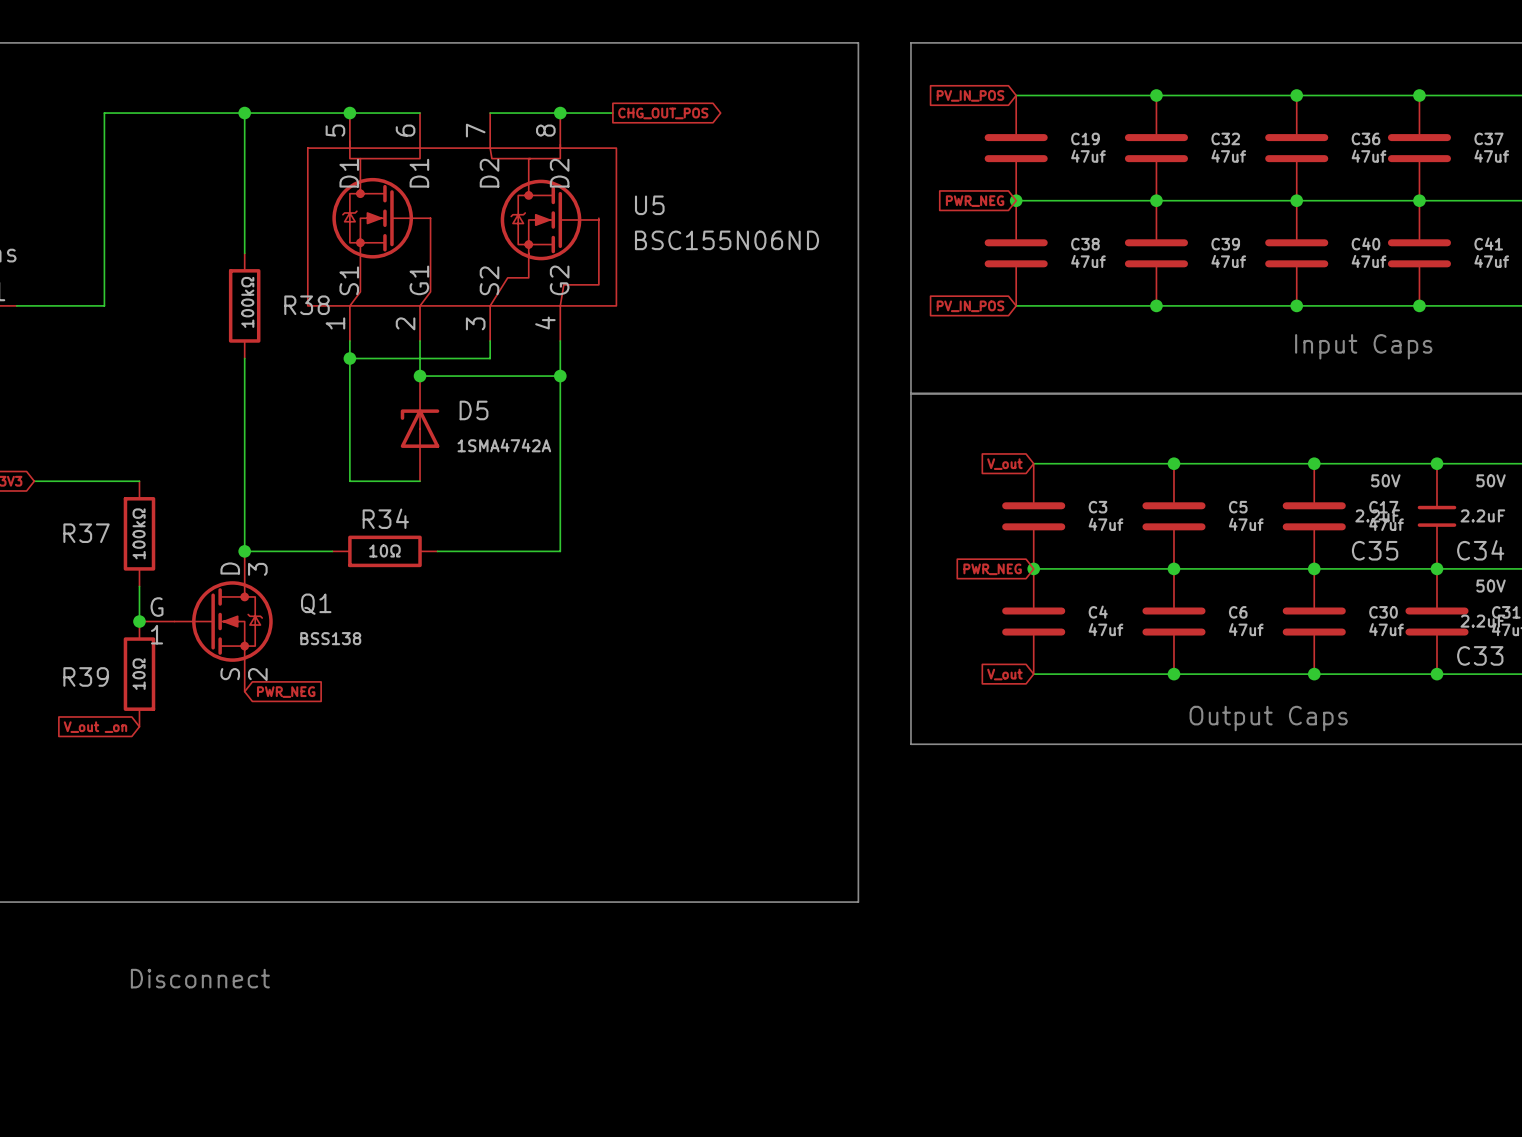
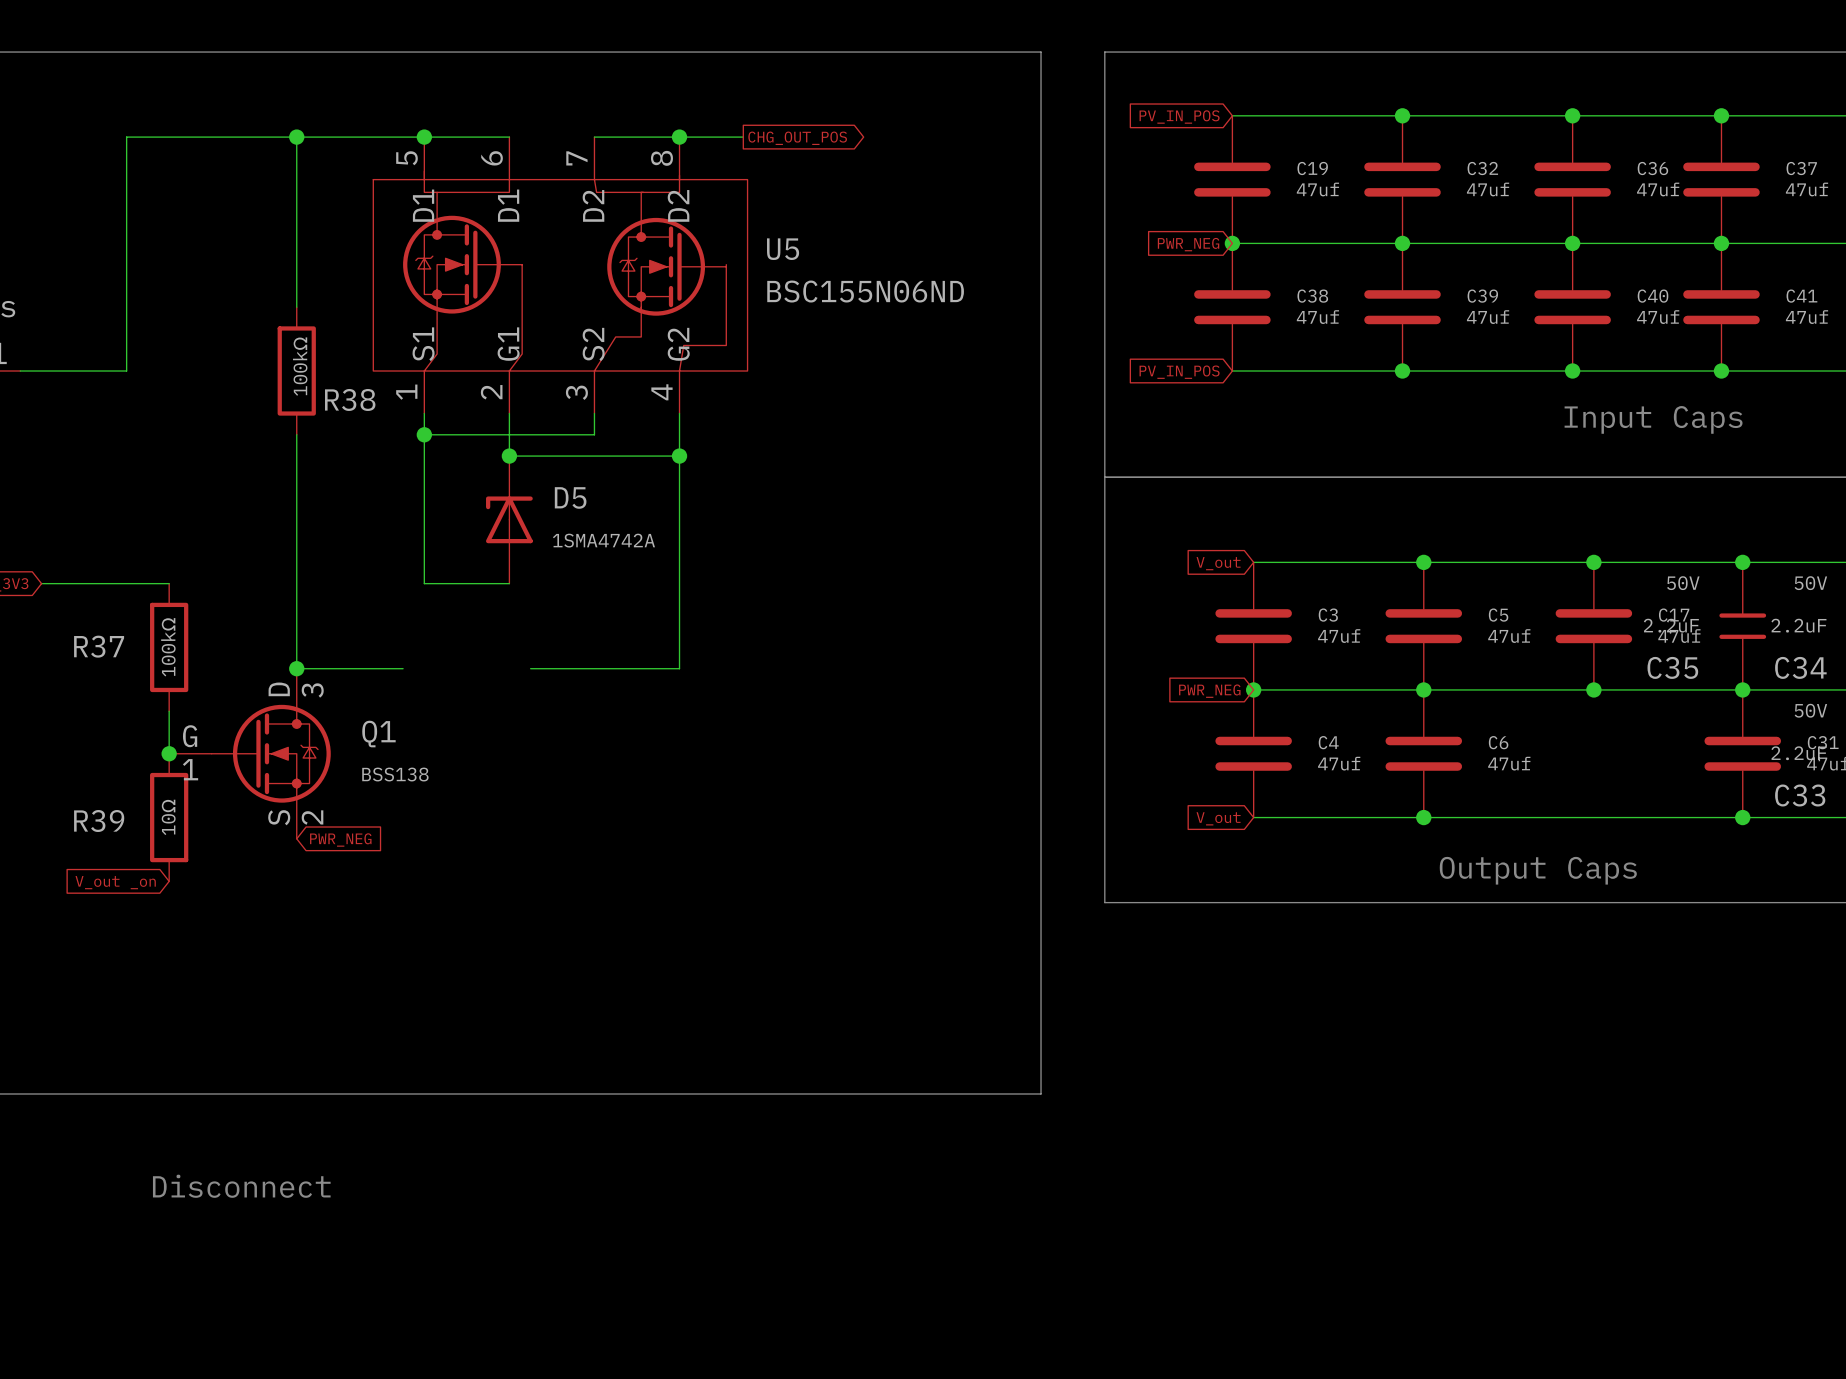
R38 name position: R38 (307, 305) -> R38 (350, 399)
R34: 10Ω (384, 551) -> none
C30: 47uf (1314, 621) -> none
junction: (1314, 674) -> none

